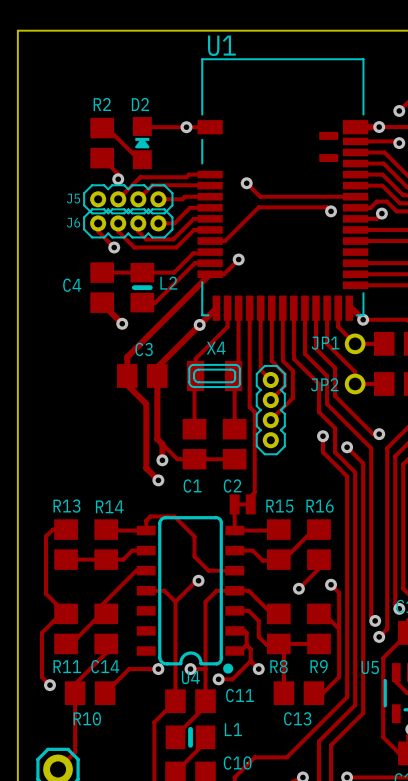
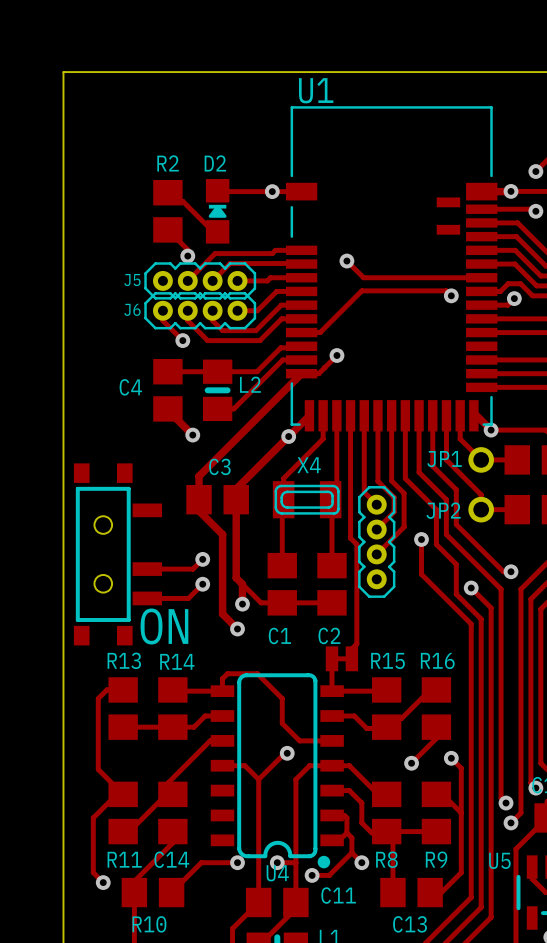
part: none -> (117, 554)
track: none -> (202, 559) (193, 569) (147, 569)
via: none -> (202, 559)
track: (323, 436) (323, 452) -> (421, 539) (421, 574) (441, 594)
via position: (323, 436) -> (421, 539)
track: none -> (202, 584) (188, 598) (147, 598)
via: none -> (202, 584)
text: none -> ON (164, 626)

